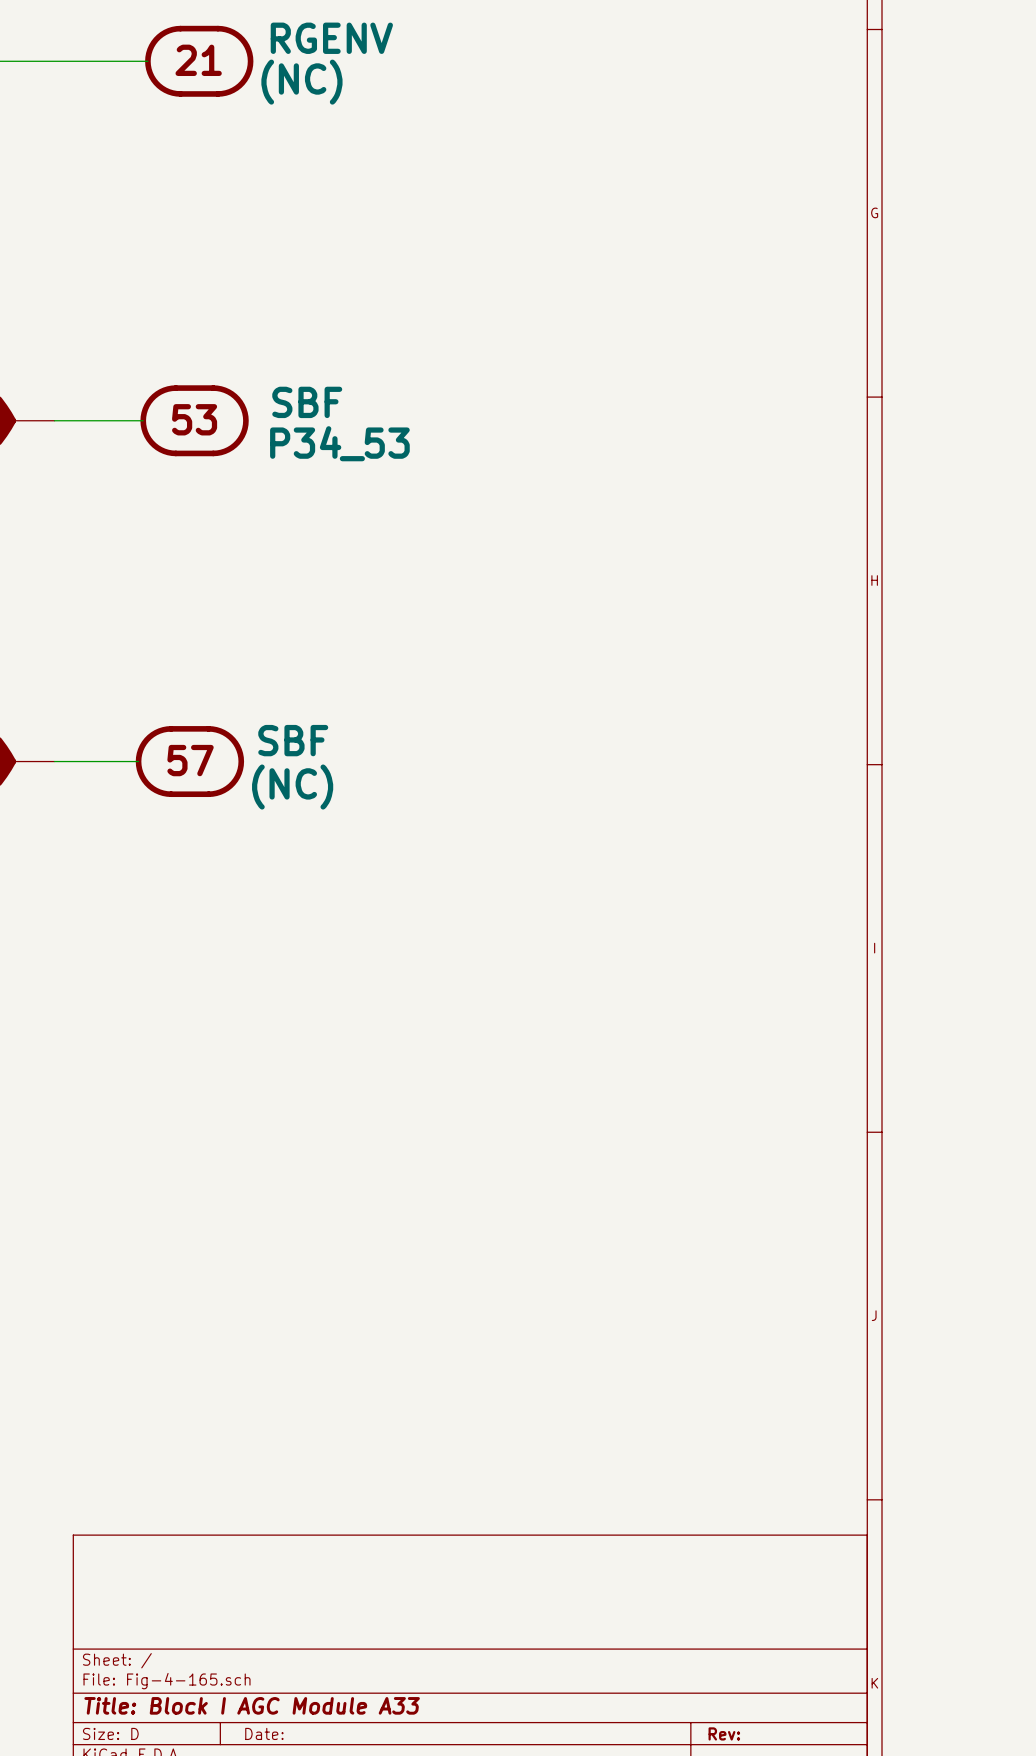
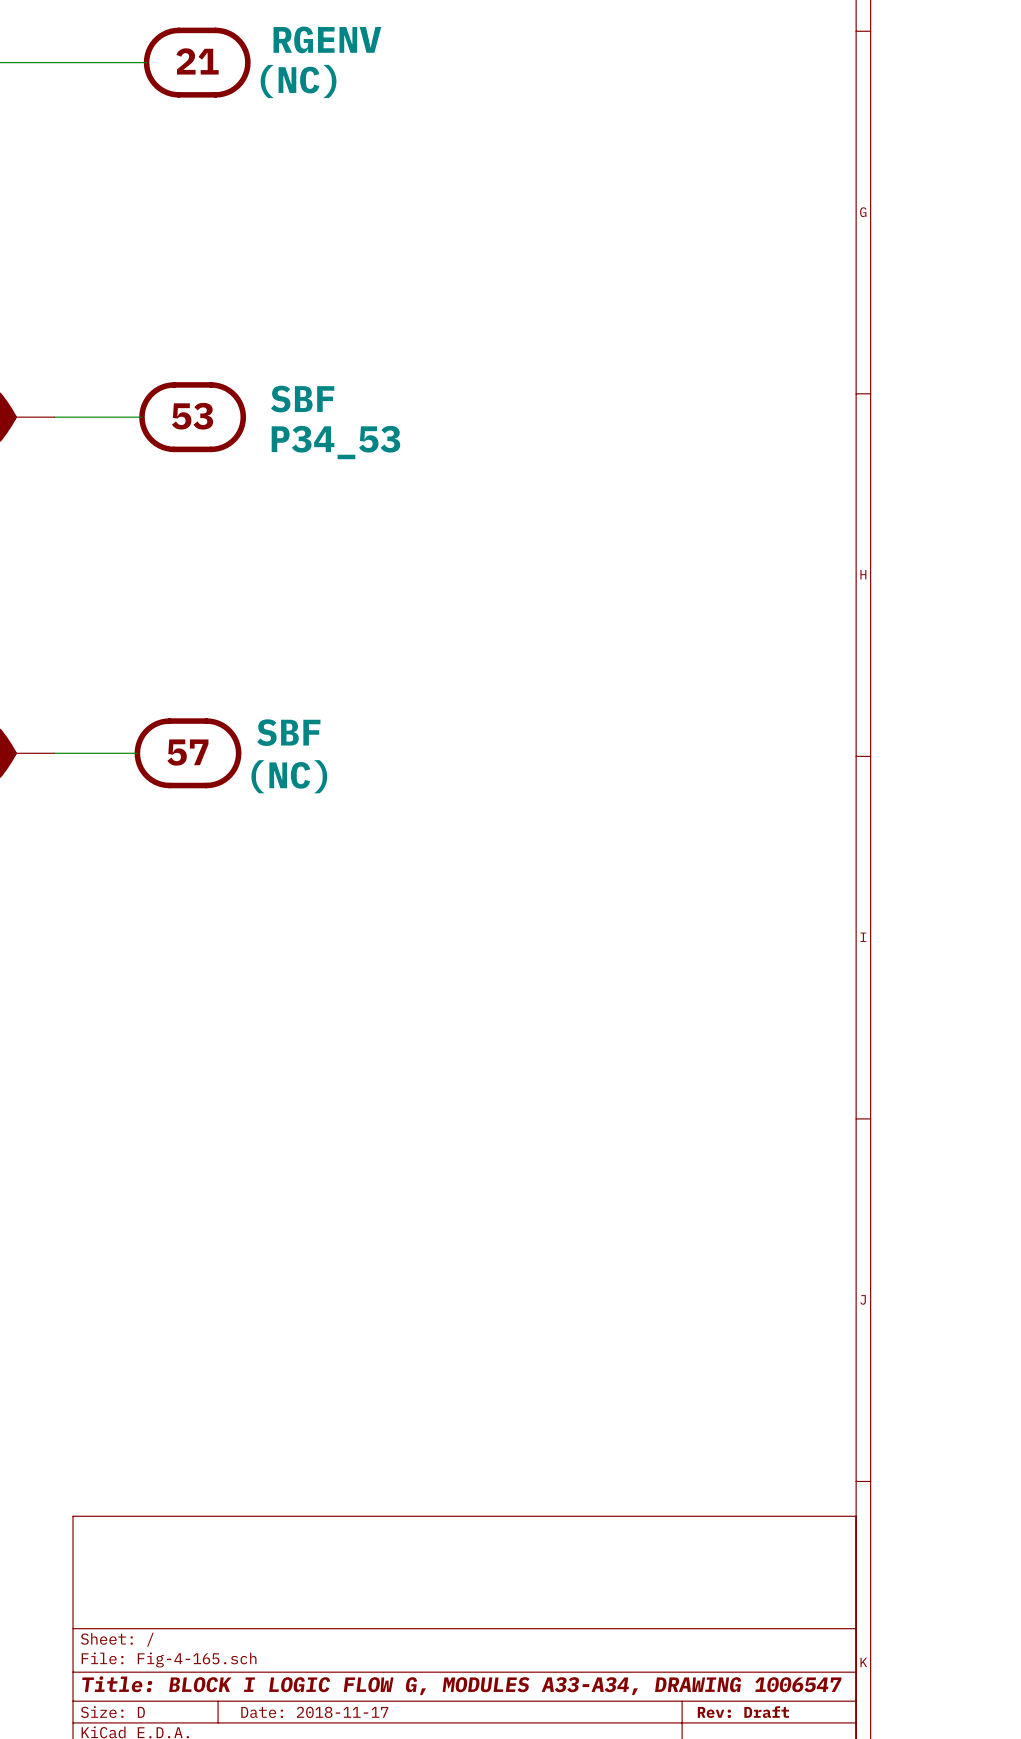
title block: Title: Block I AGC Module A33 (252, 1705) -> Title: BLOCK I LOGIC FLOW G, MODULES A33-A34, DRAWING 1006547 (461, 1685)
title block: Date: (264, 1733) -> Date: 2018-11-17 (314, 1712)
title block: Rev: (724, 1733) -> Rev: Draft (743, 1712)

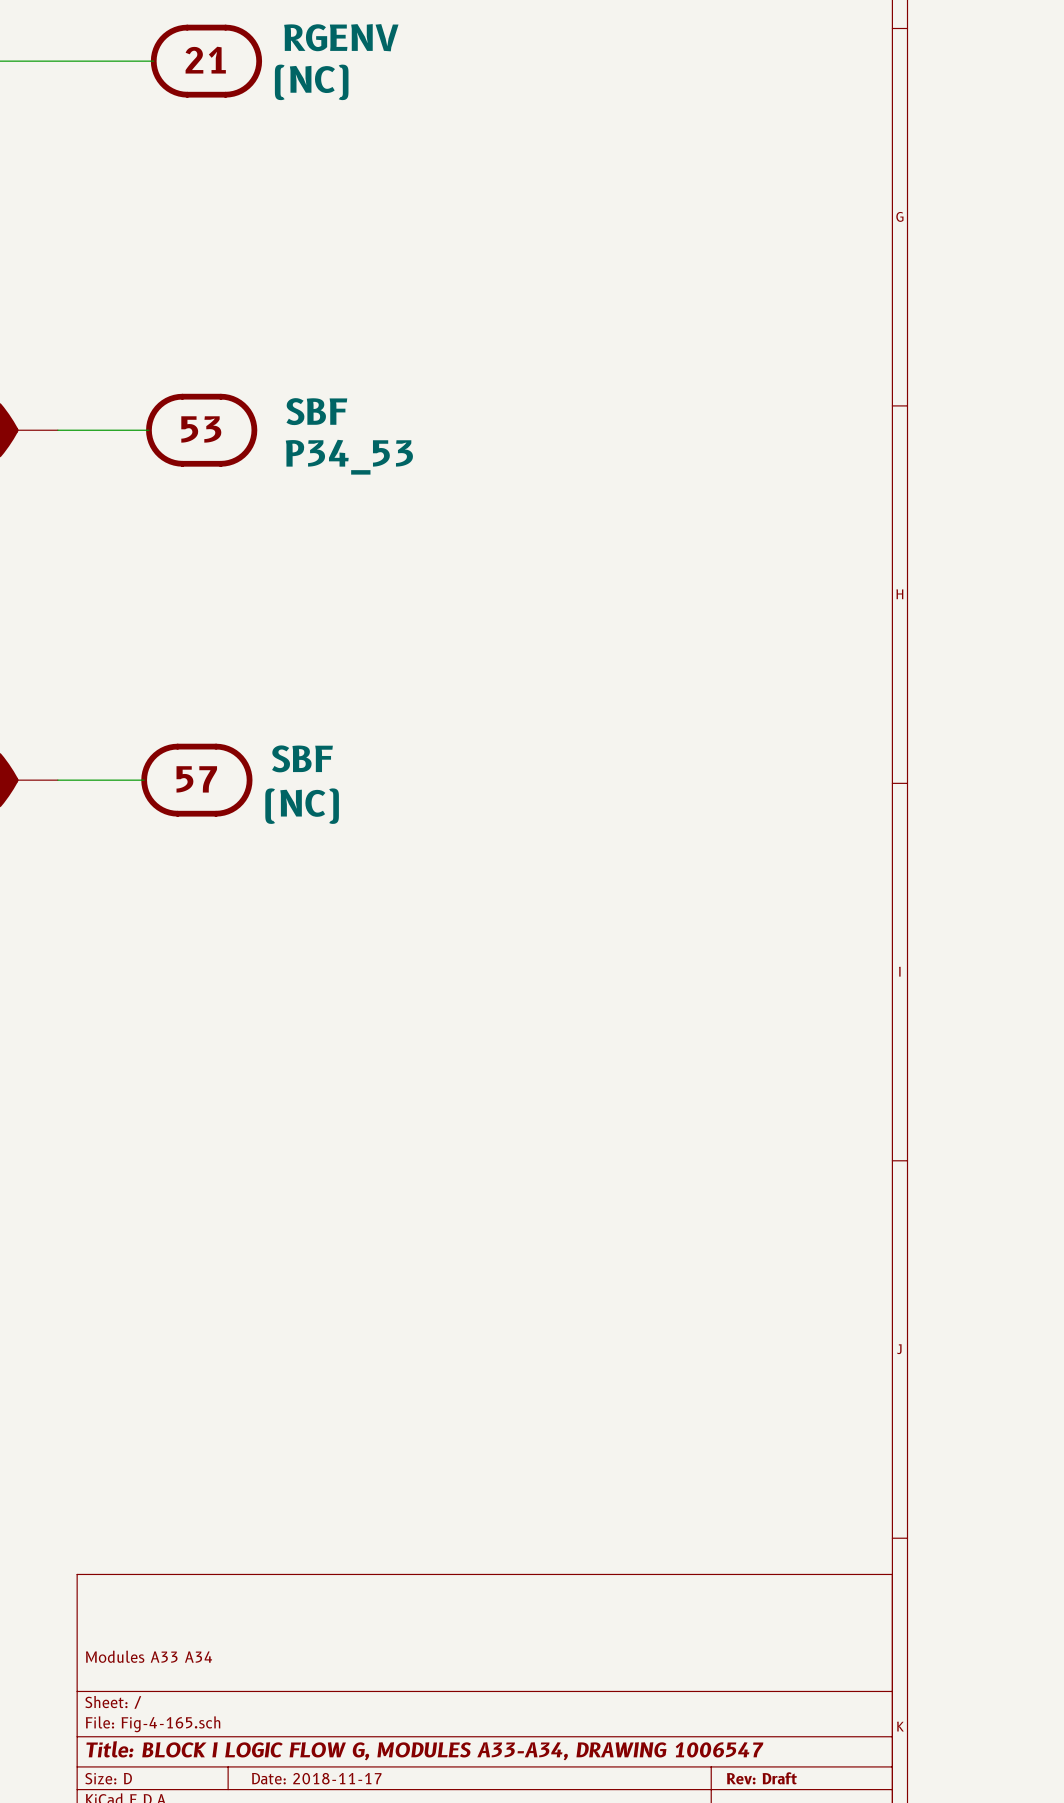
title block: none -> Modules A33 A34 (149, 1656)

